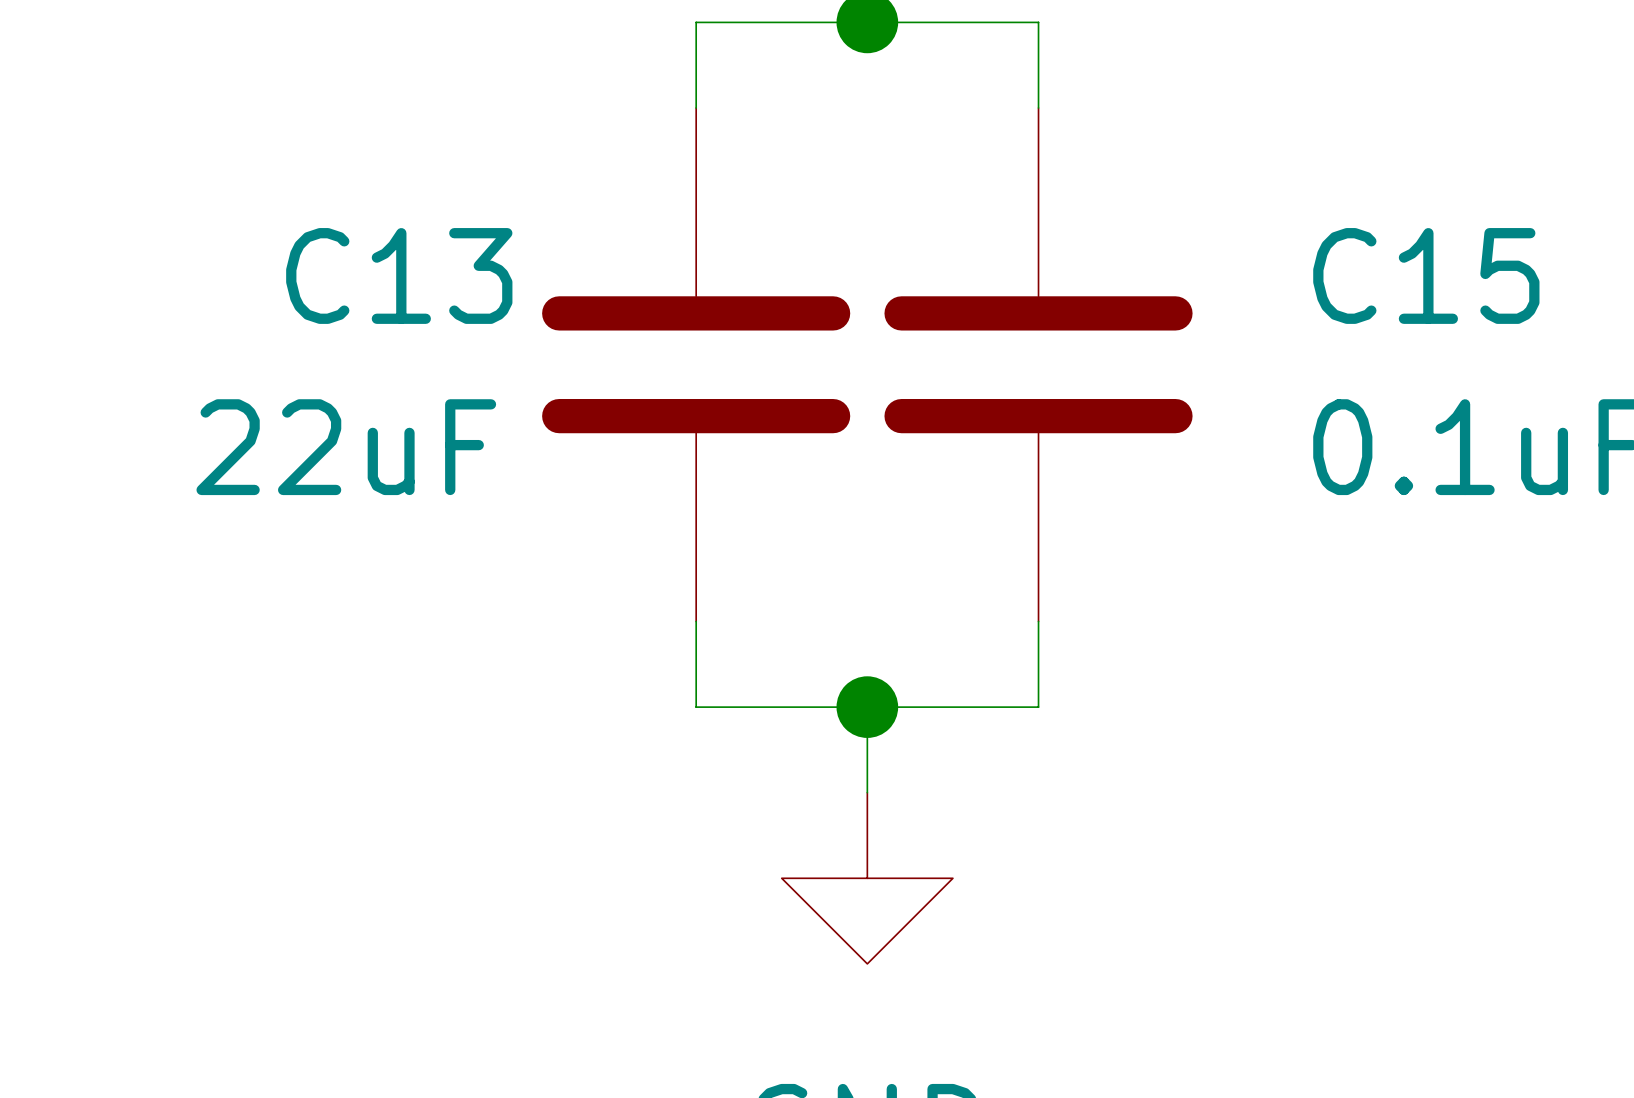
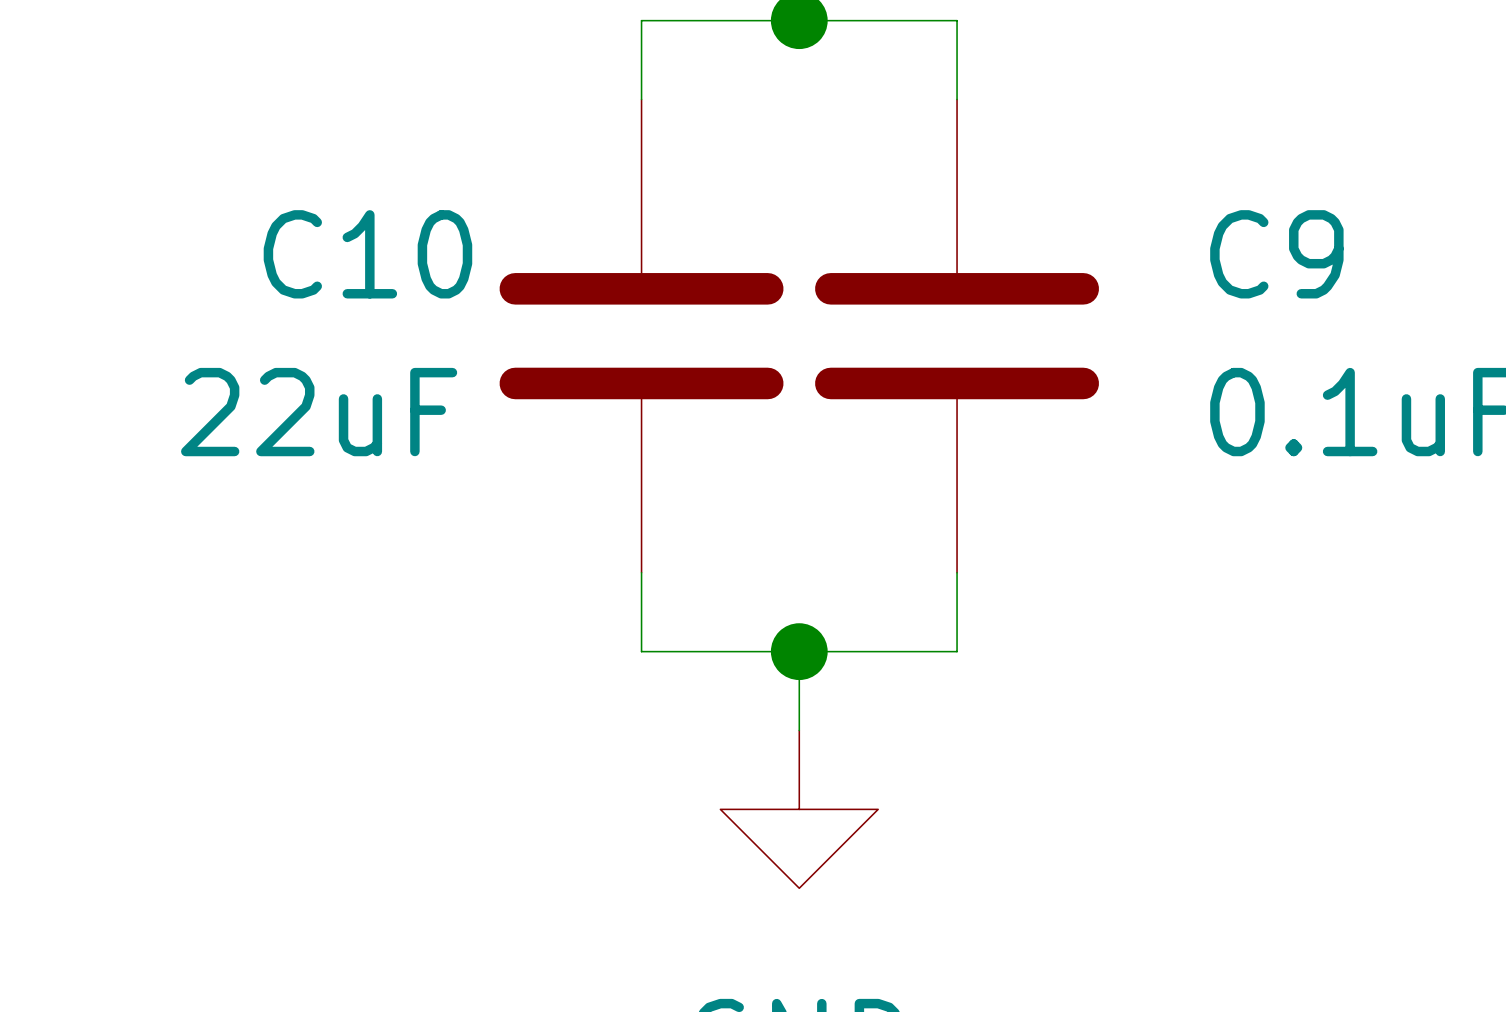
C13 name: C13 (399, 275) -> C10 (367, 254)
C15 name: C15 (1426, 275) -> C9 (1276, 254)

